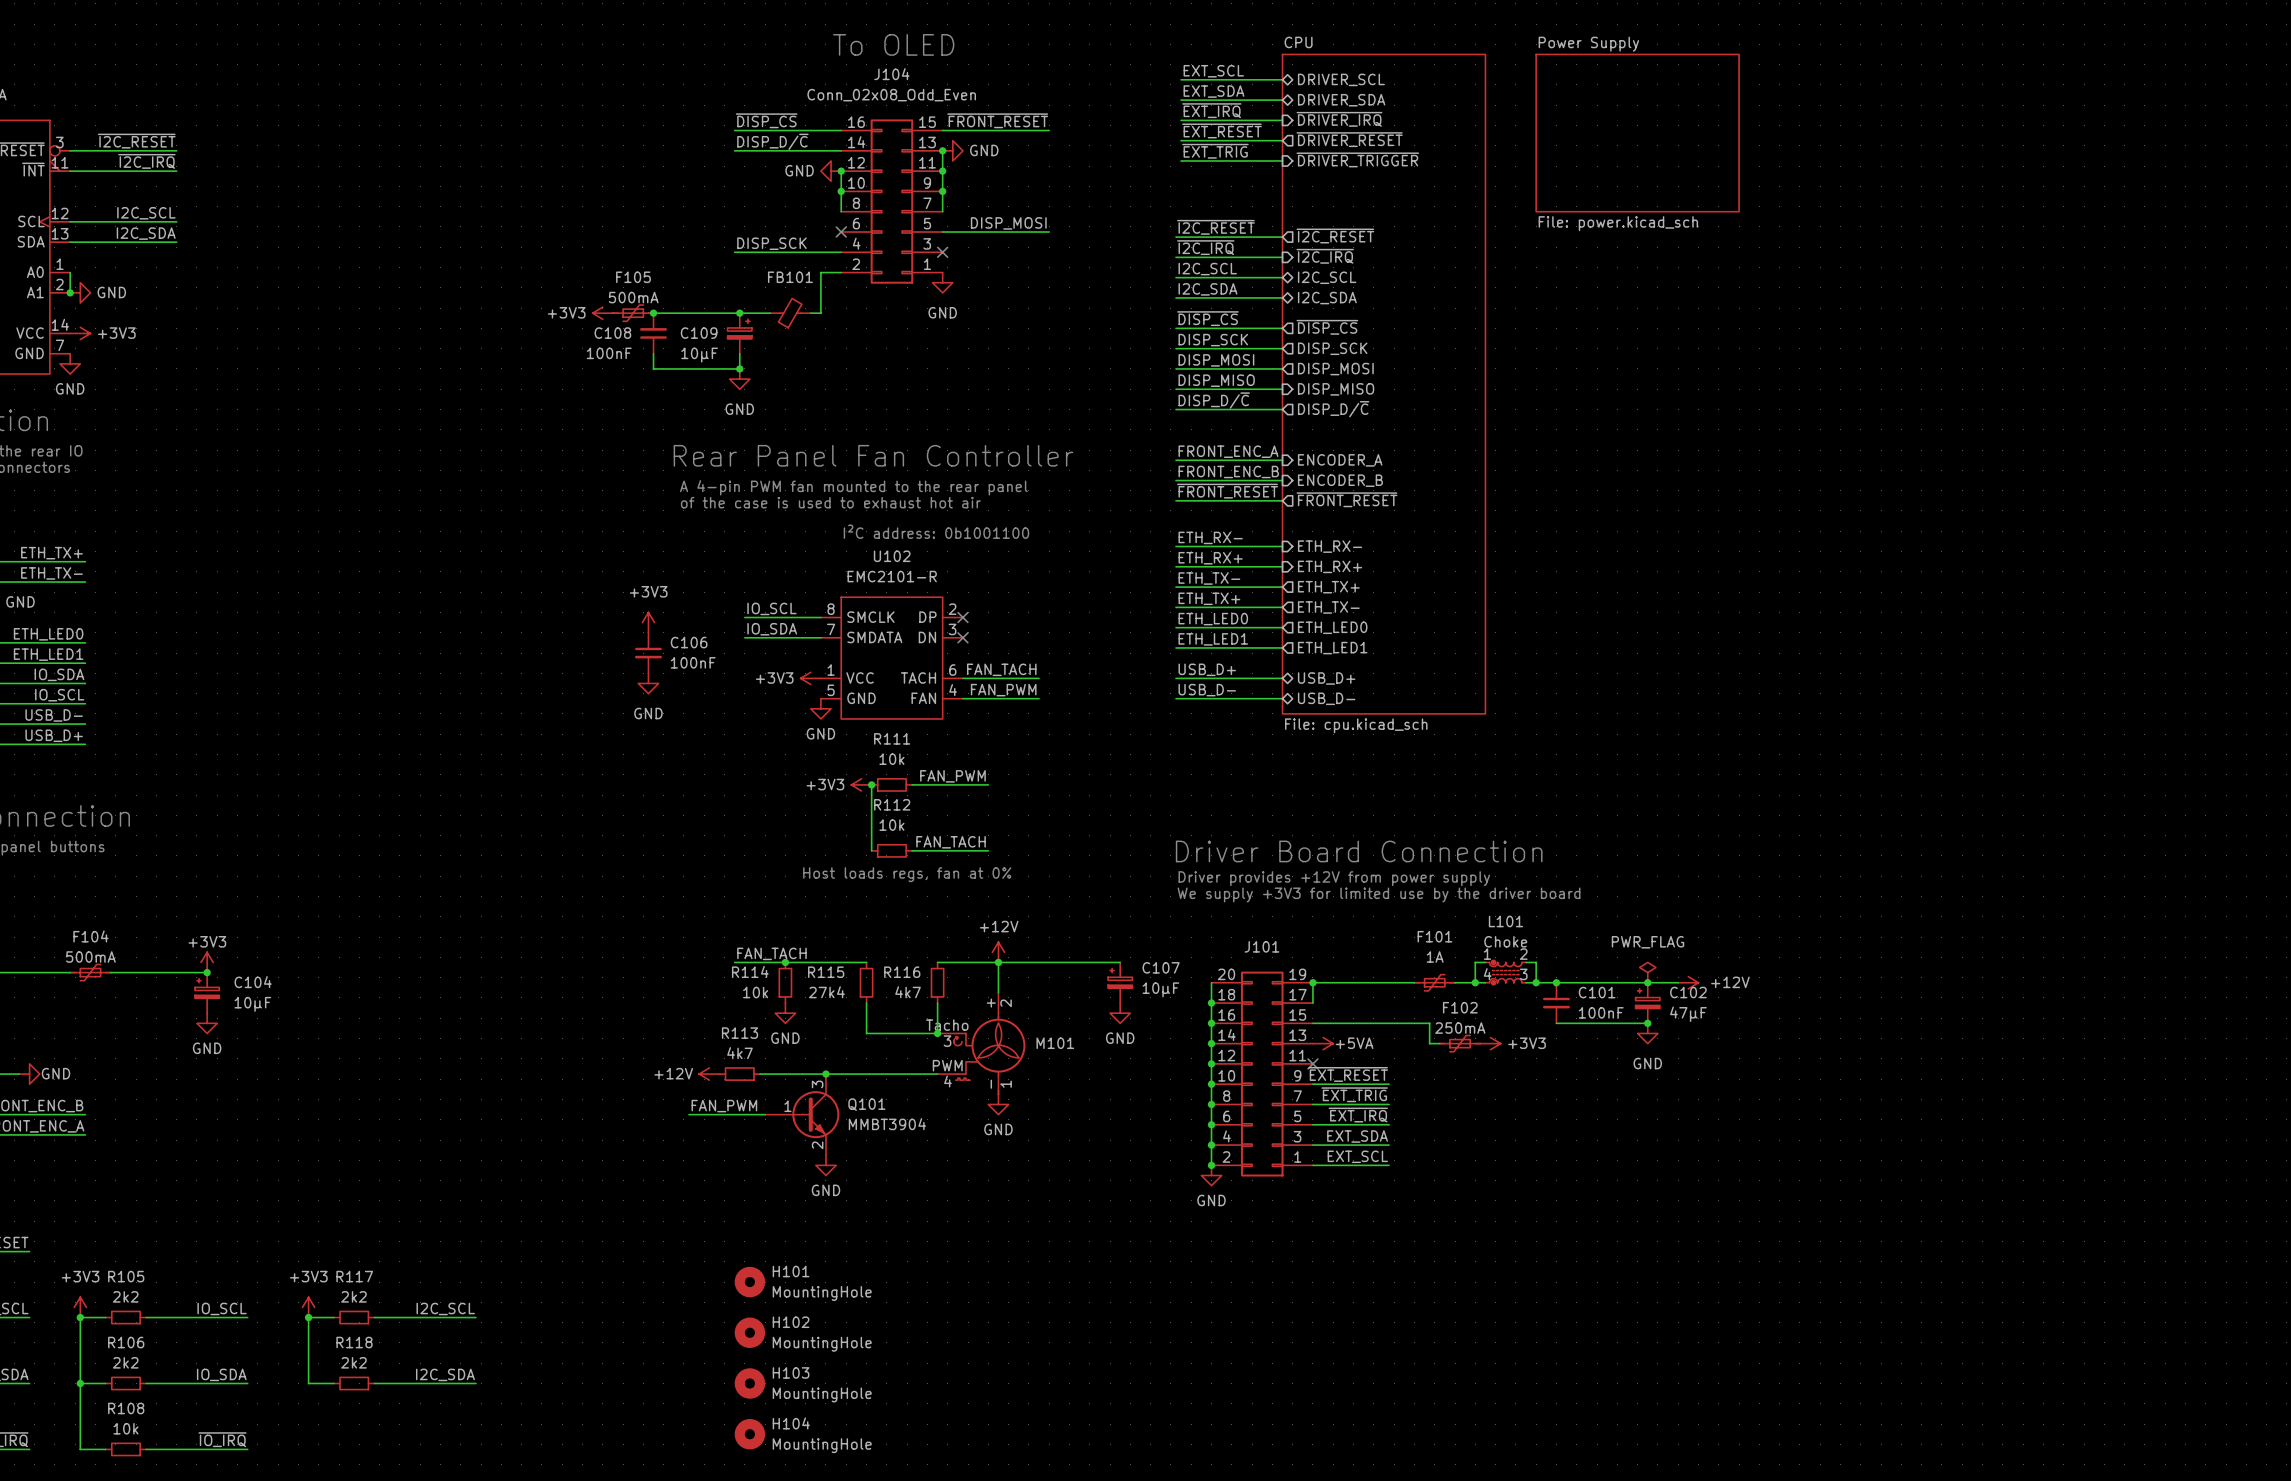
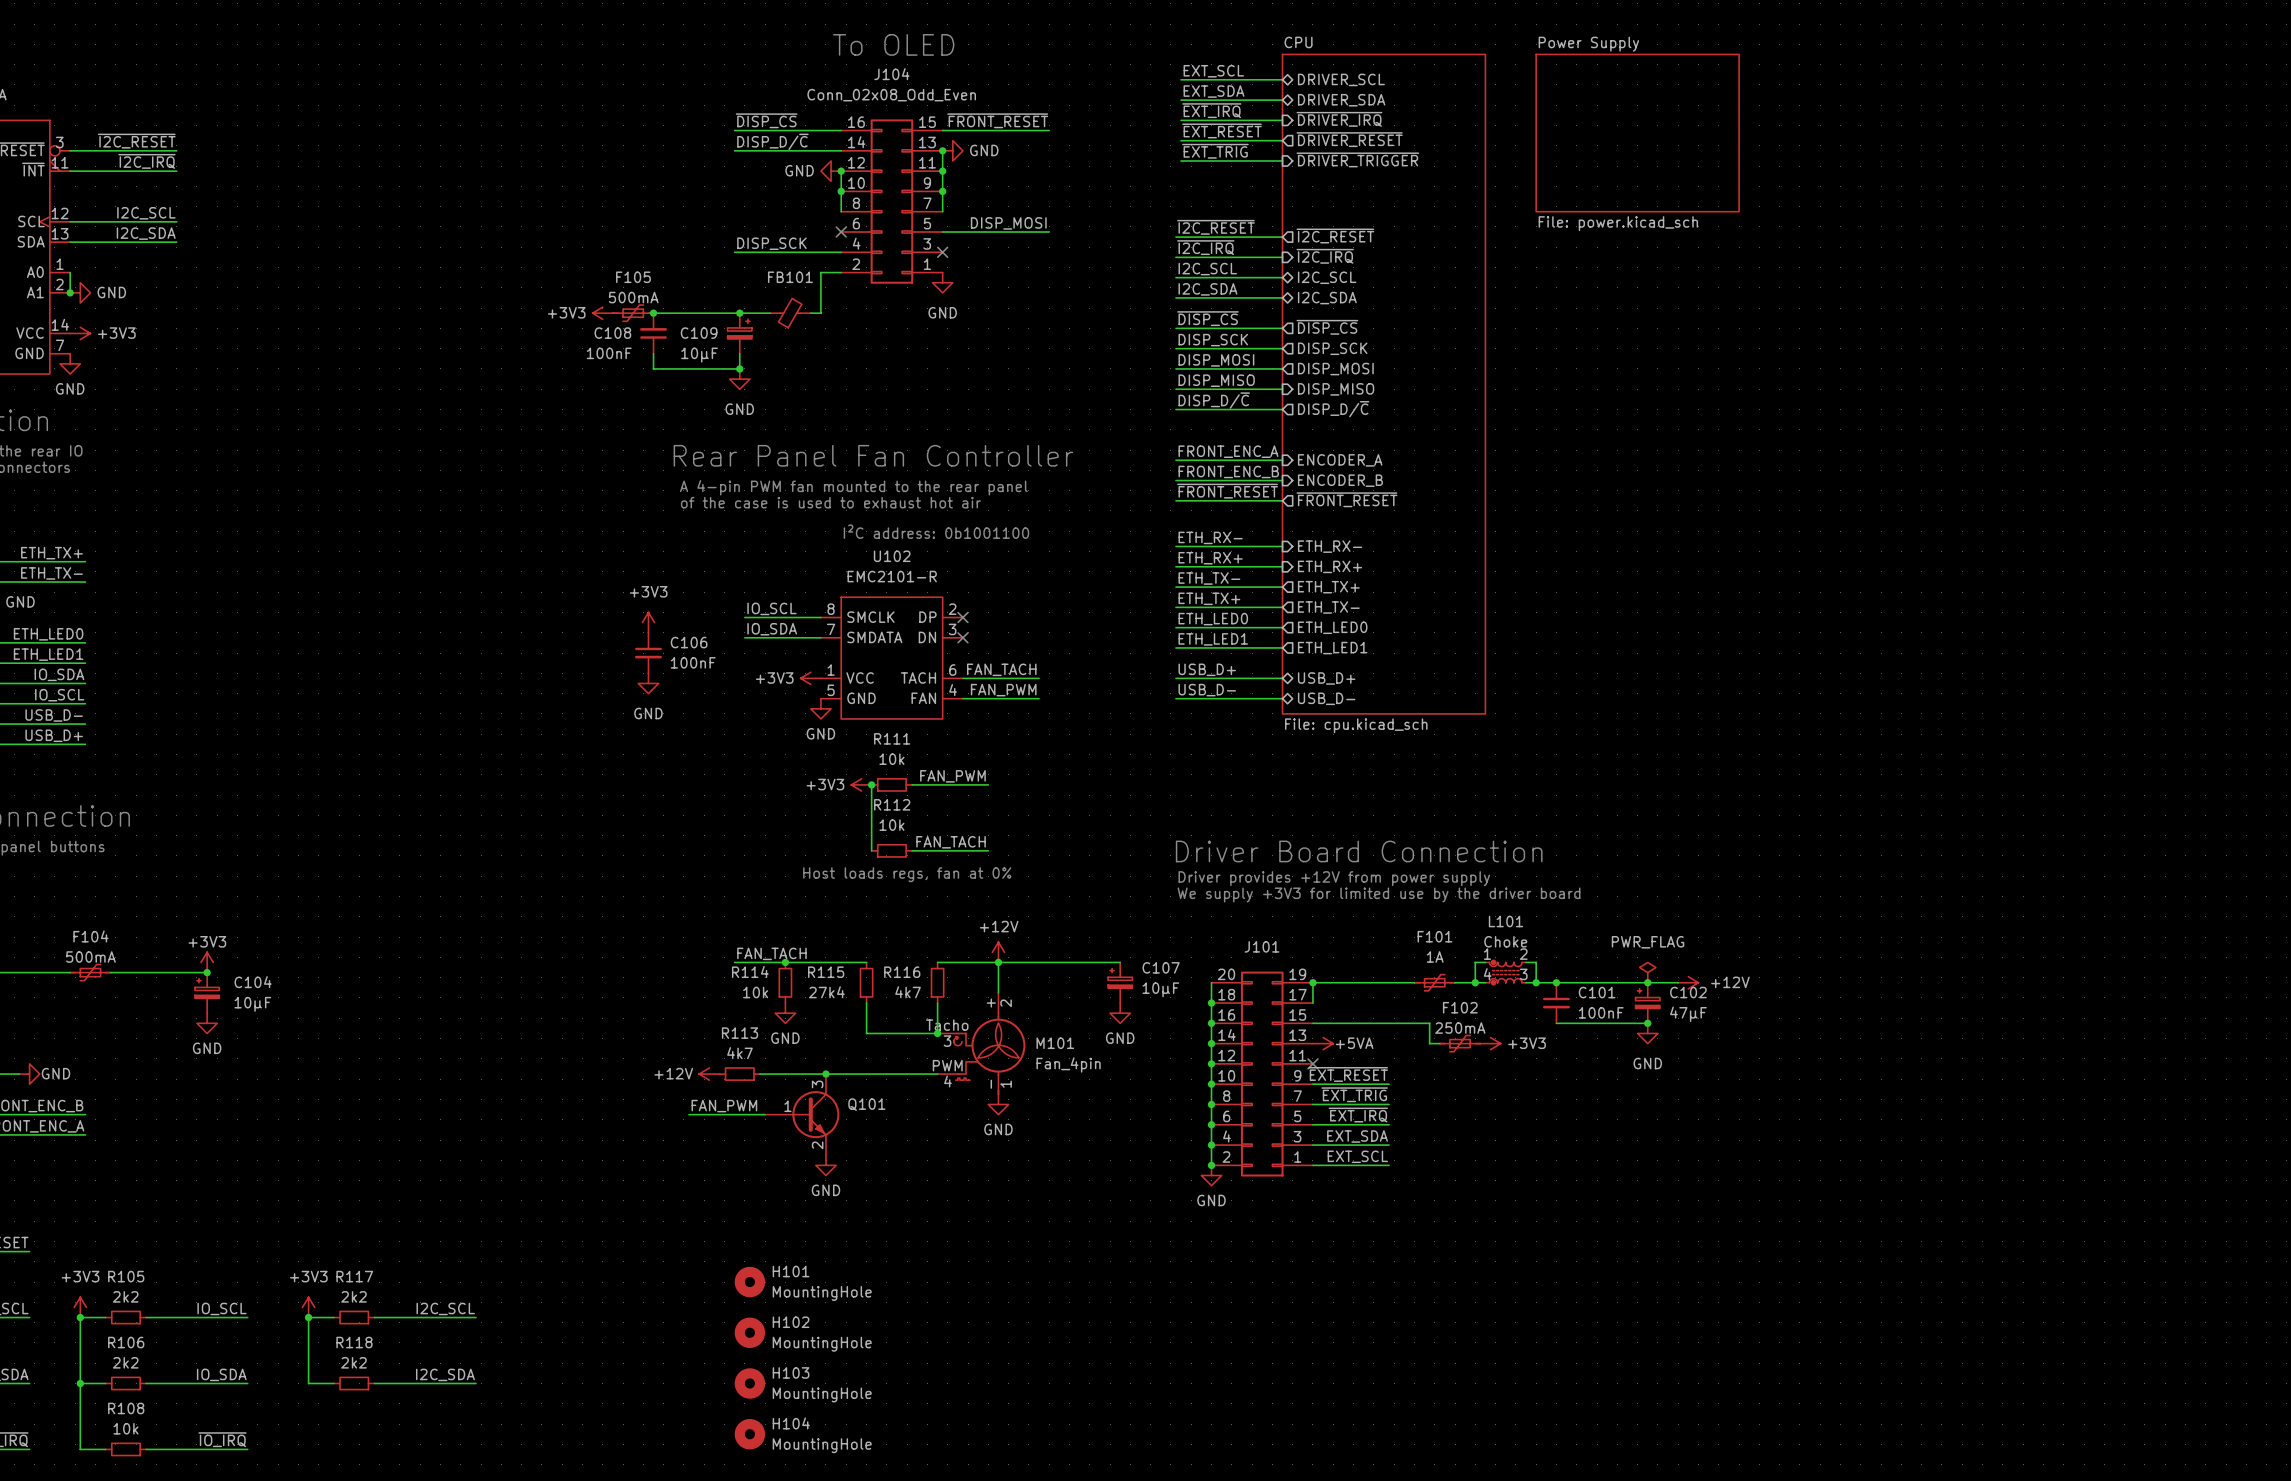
M101 value: none -> Fan_4pin (1068, 1064)
Q101 value: MMBT3904 (887, 1124) -> none

